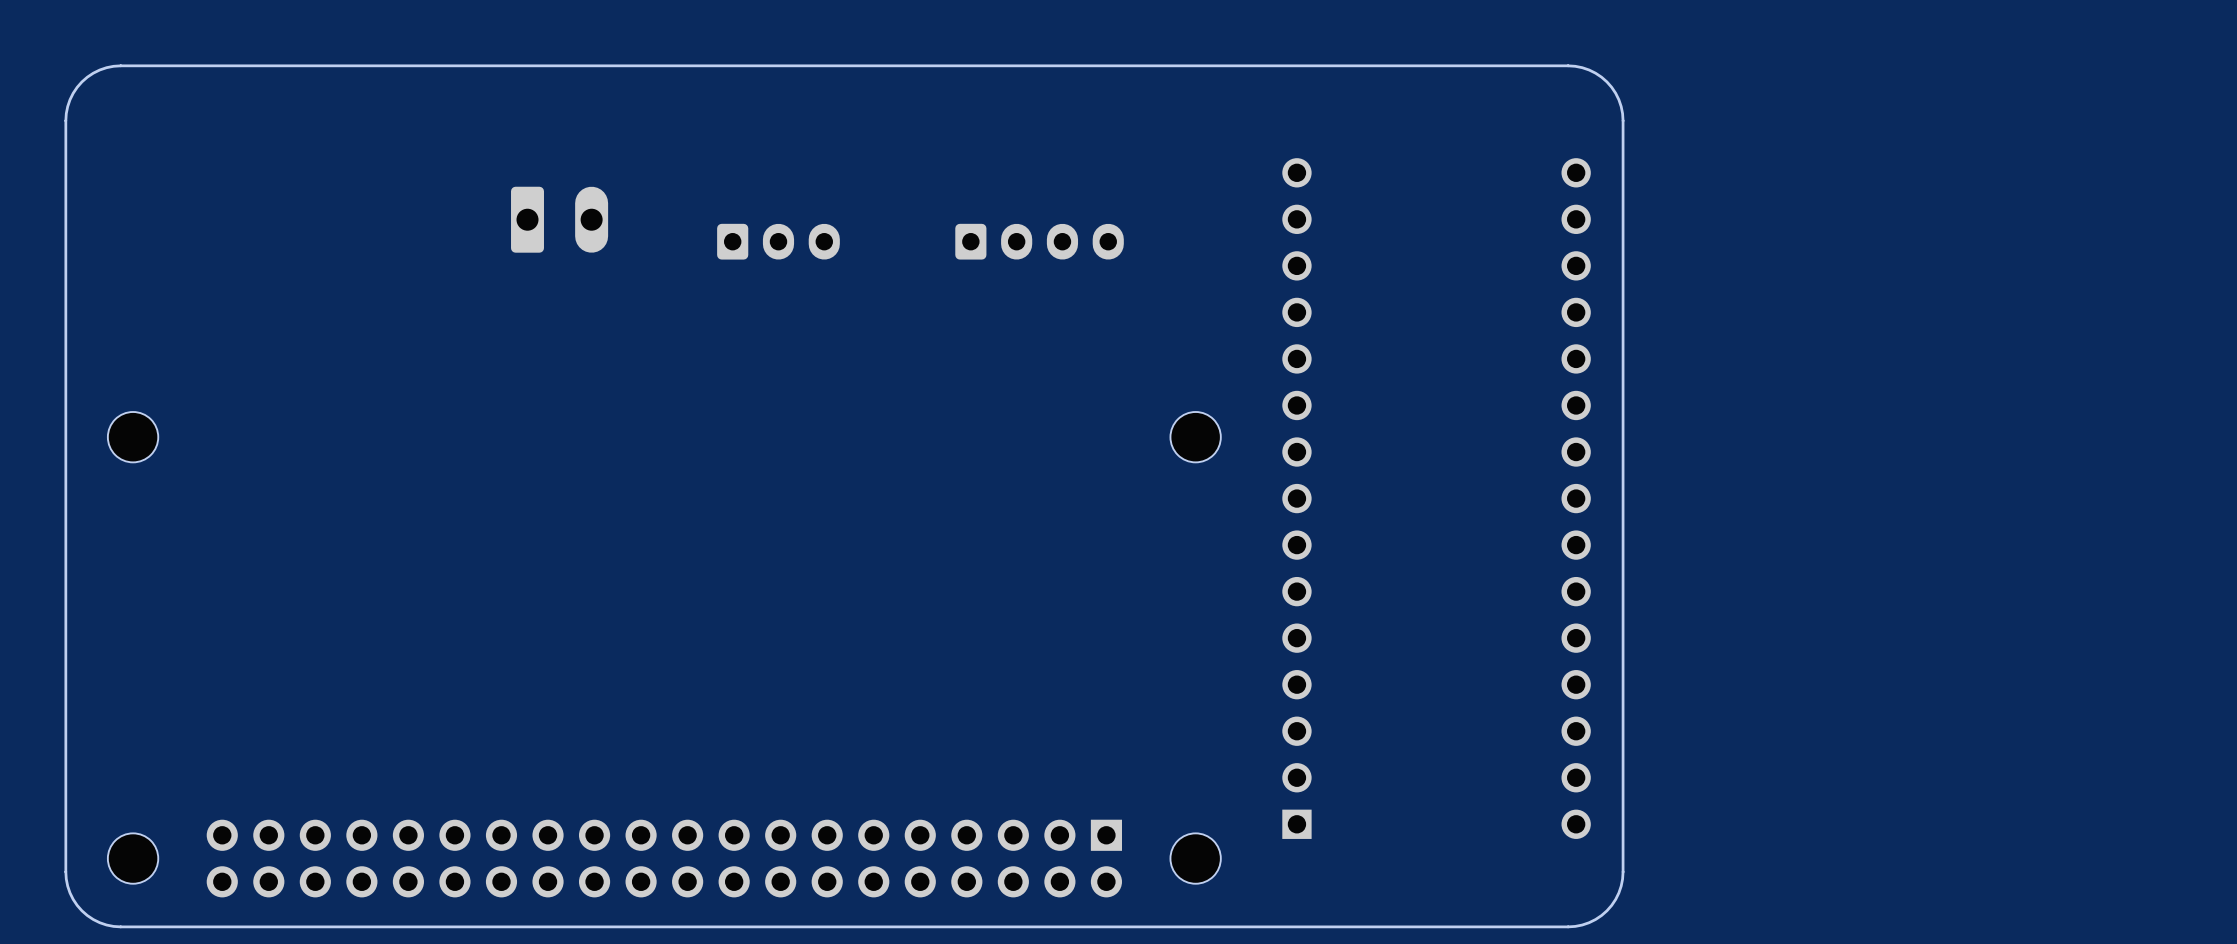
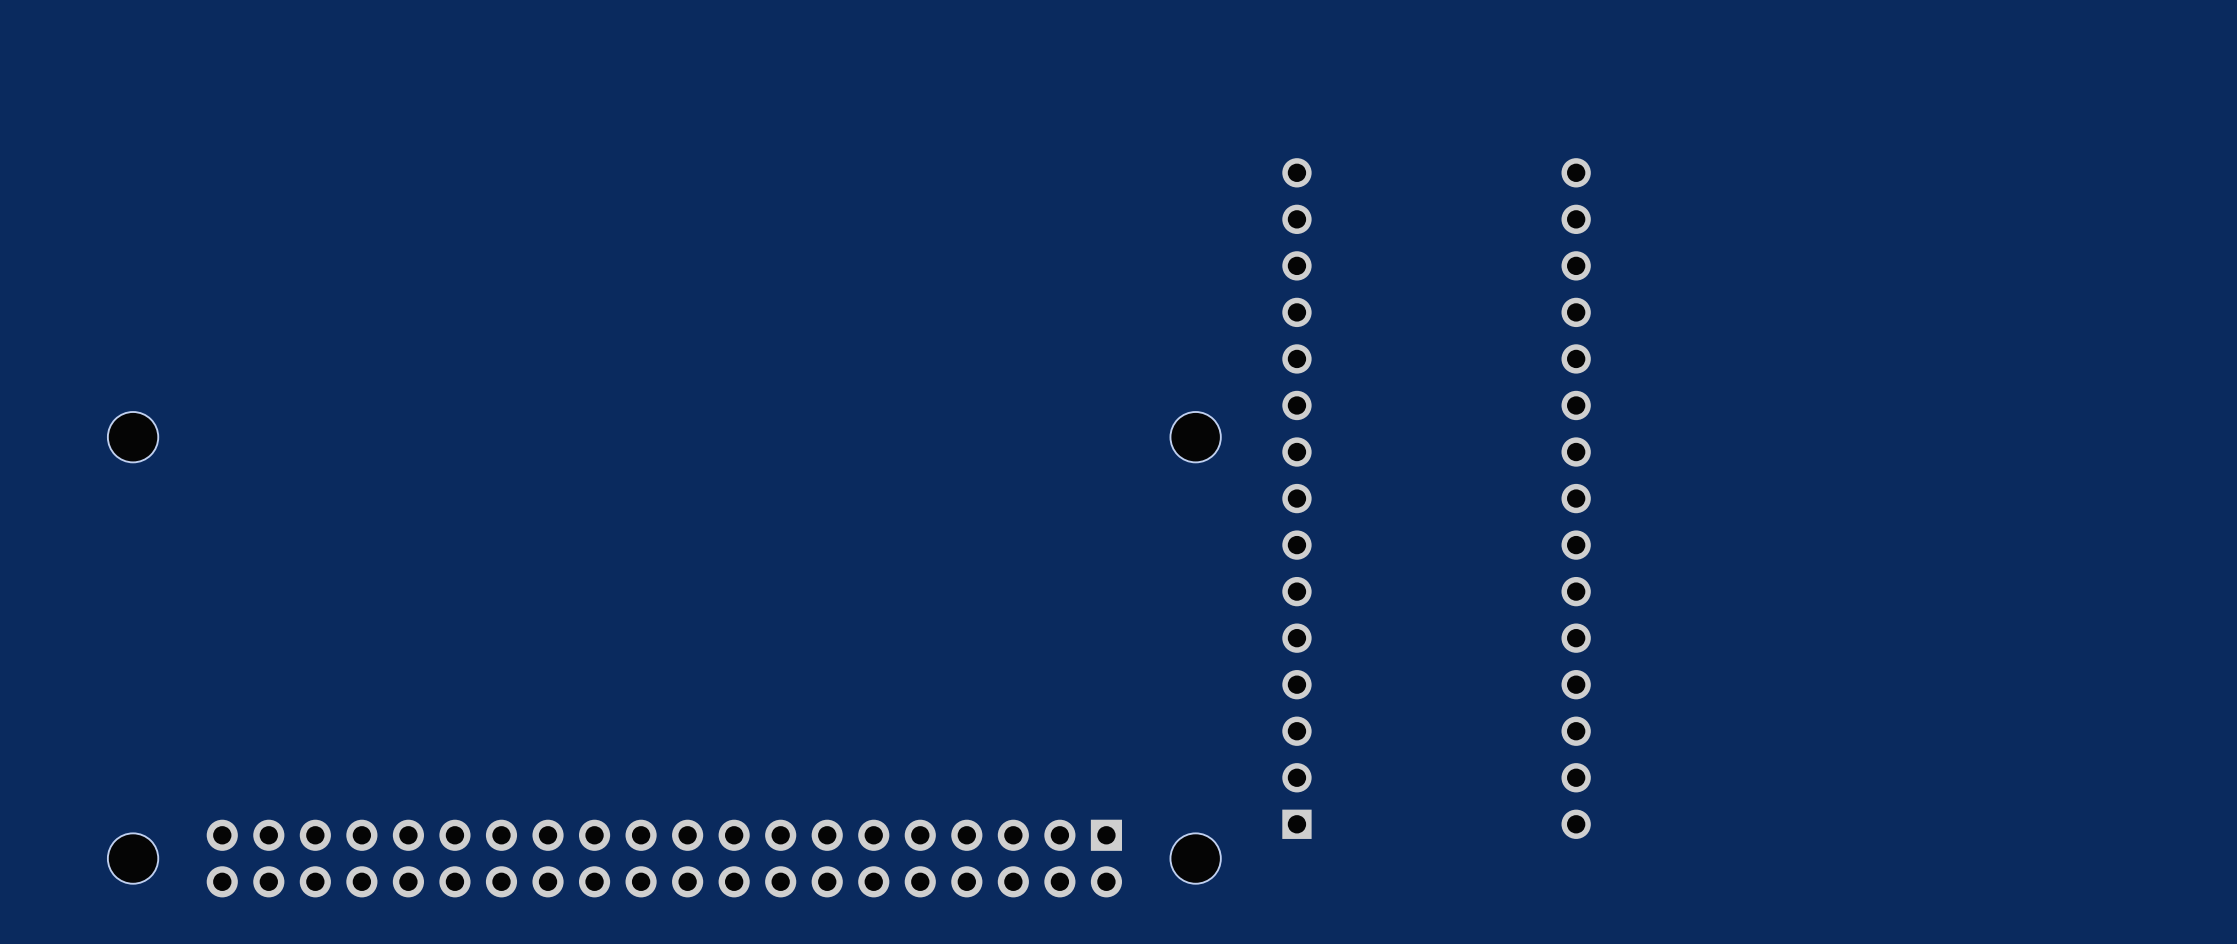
board edge: (1568, 65) (120, 65) (106, 67) (93, 73) (81, 81) (73, 93) (67, 106) (65, 120) (65, 871) (67, 886) (73, 899) (81, 910) (93, 919) (106, 925) (120, 926) (1568, 926) (1582, 925) (1595, 919) (1606, 910) (1615, 899) (1621, 886) (1623, 871) (1623, 120) (1618, 99) (1606, 81) (1589, 70) (1568, 65) -> none
part: (559, 219) -> none
part: (778, 241) -> none
part: (1039, 241) -> none

